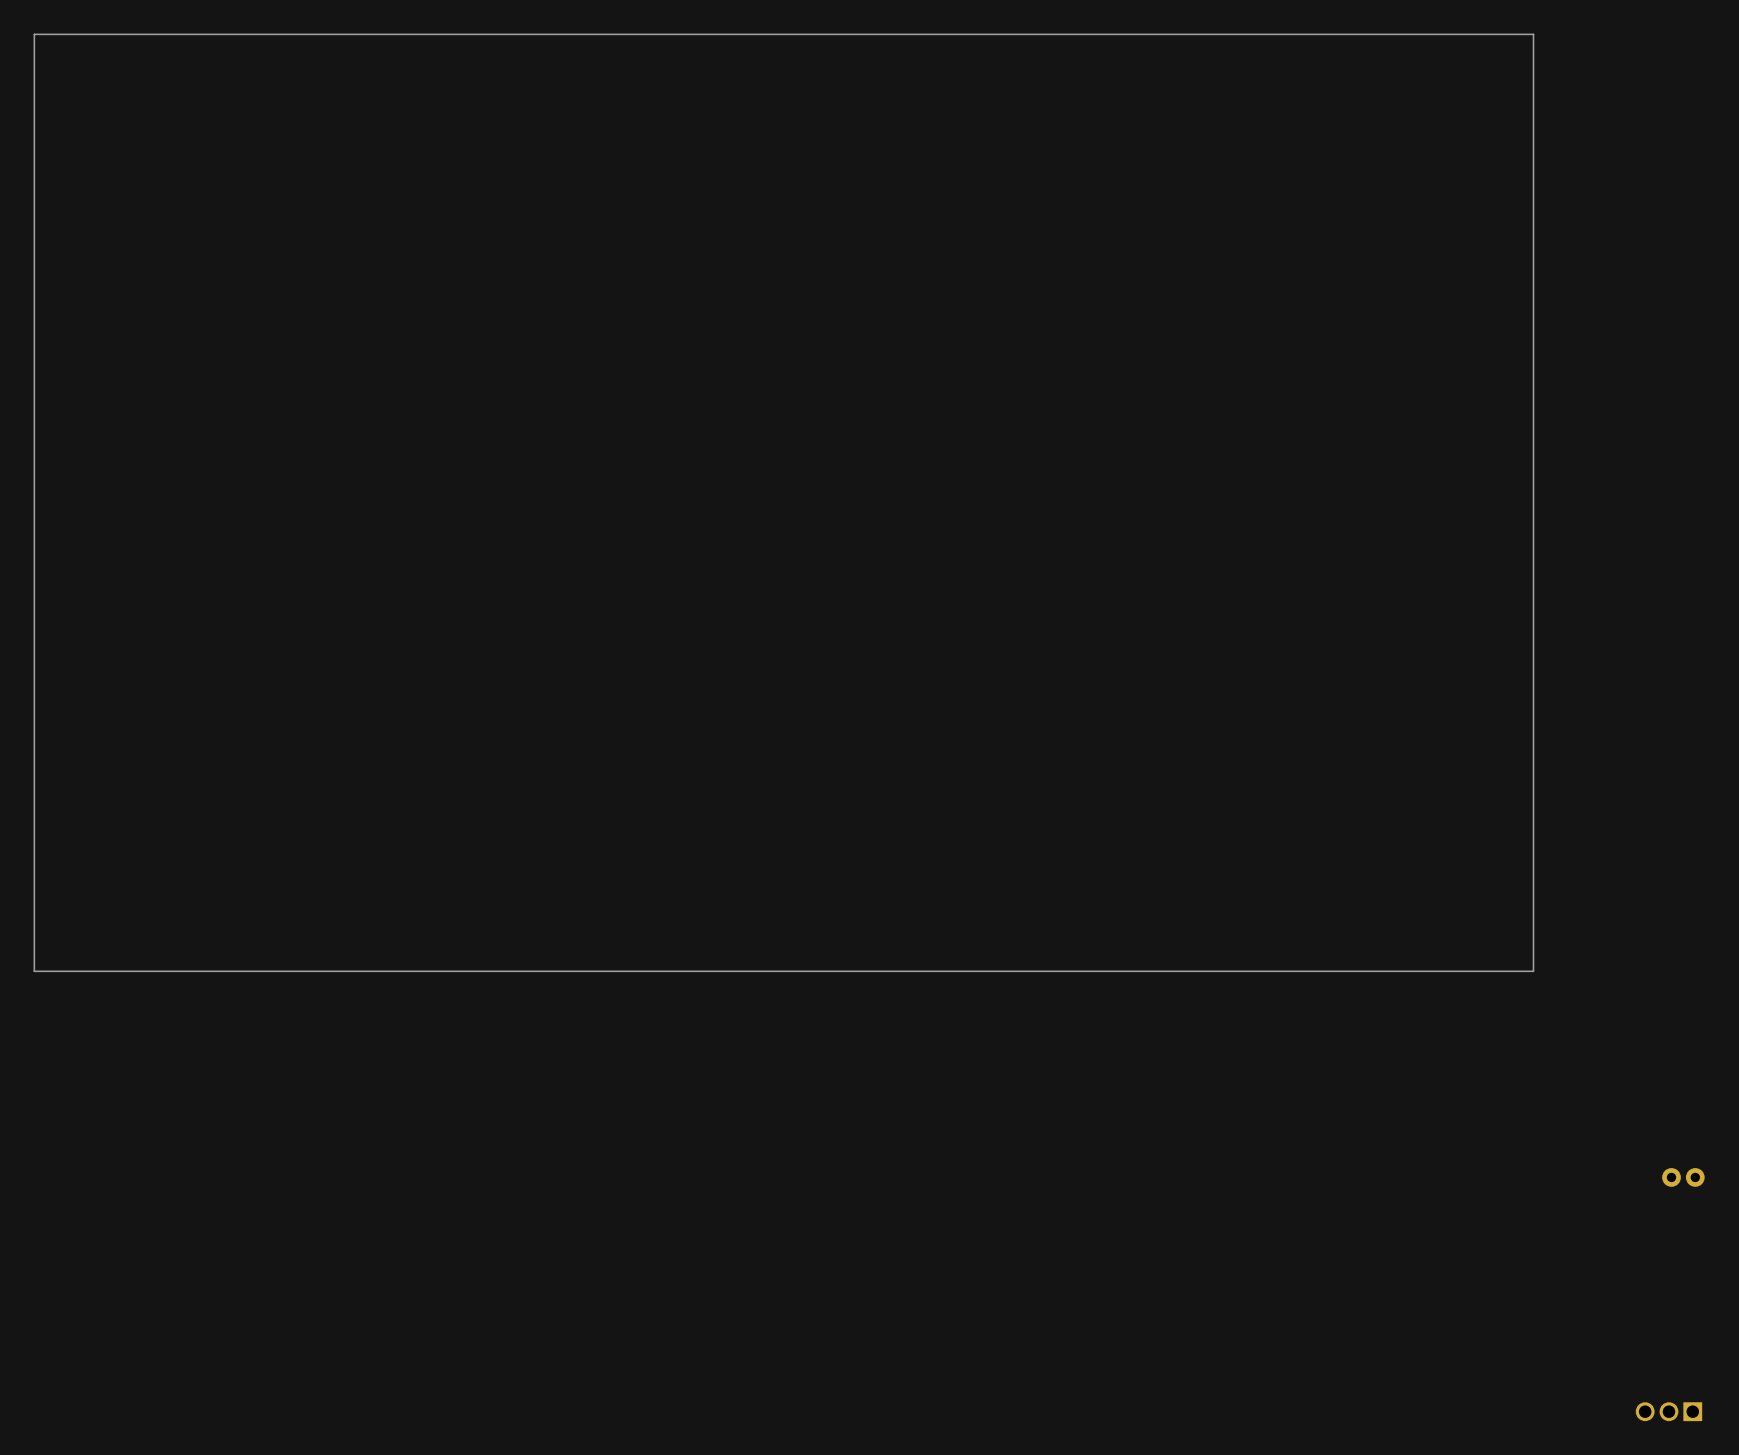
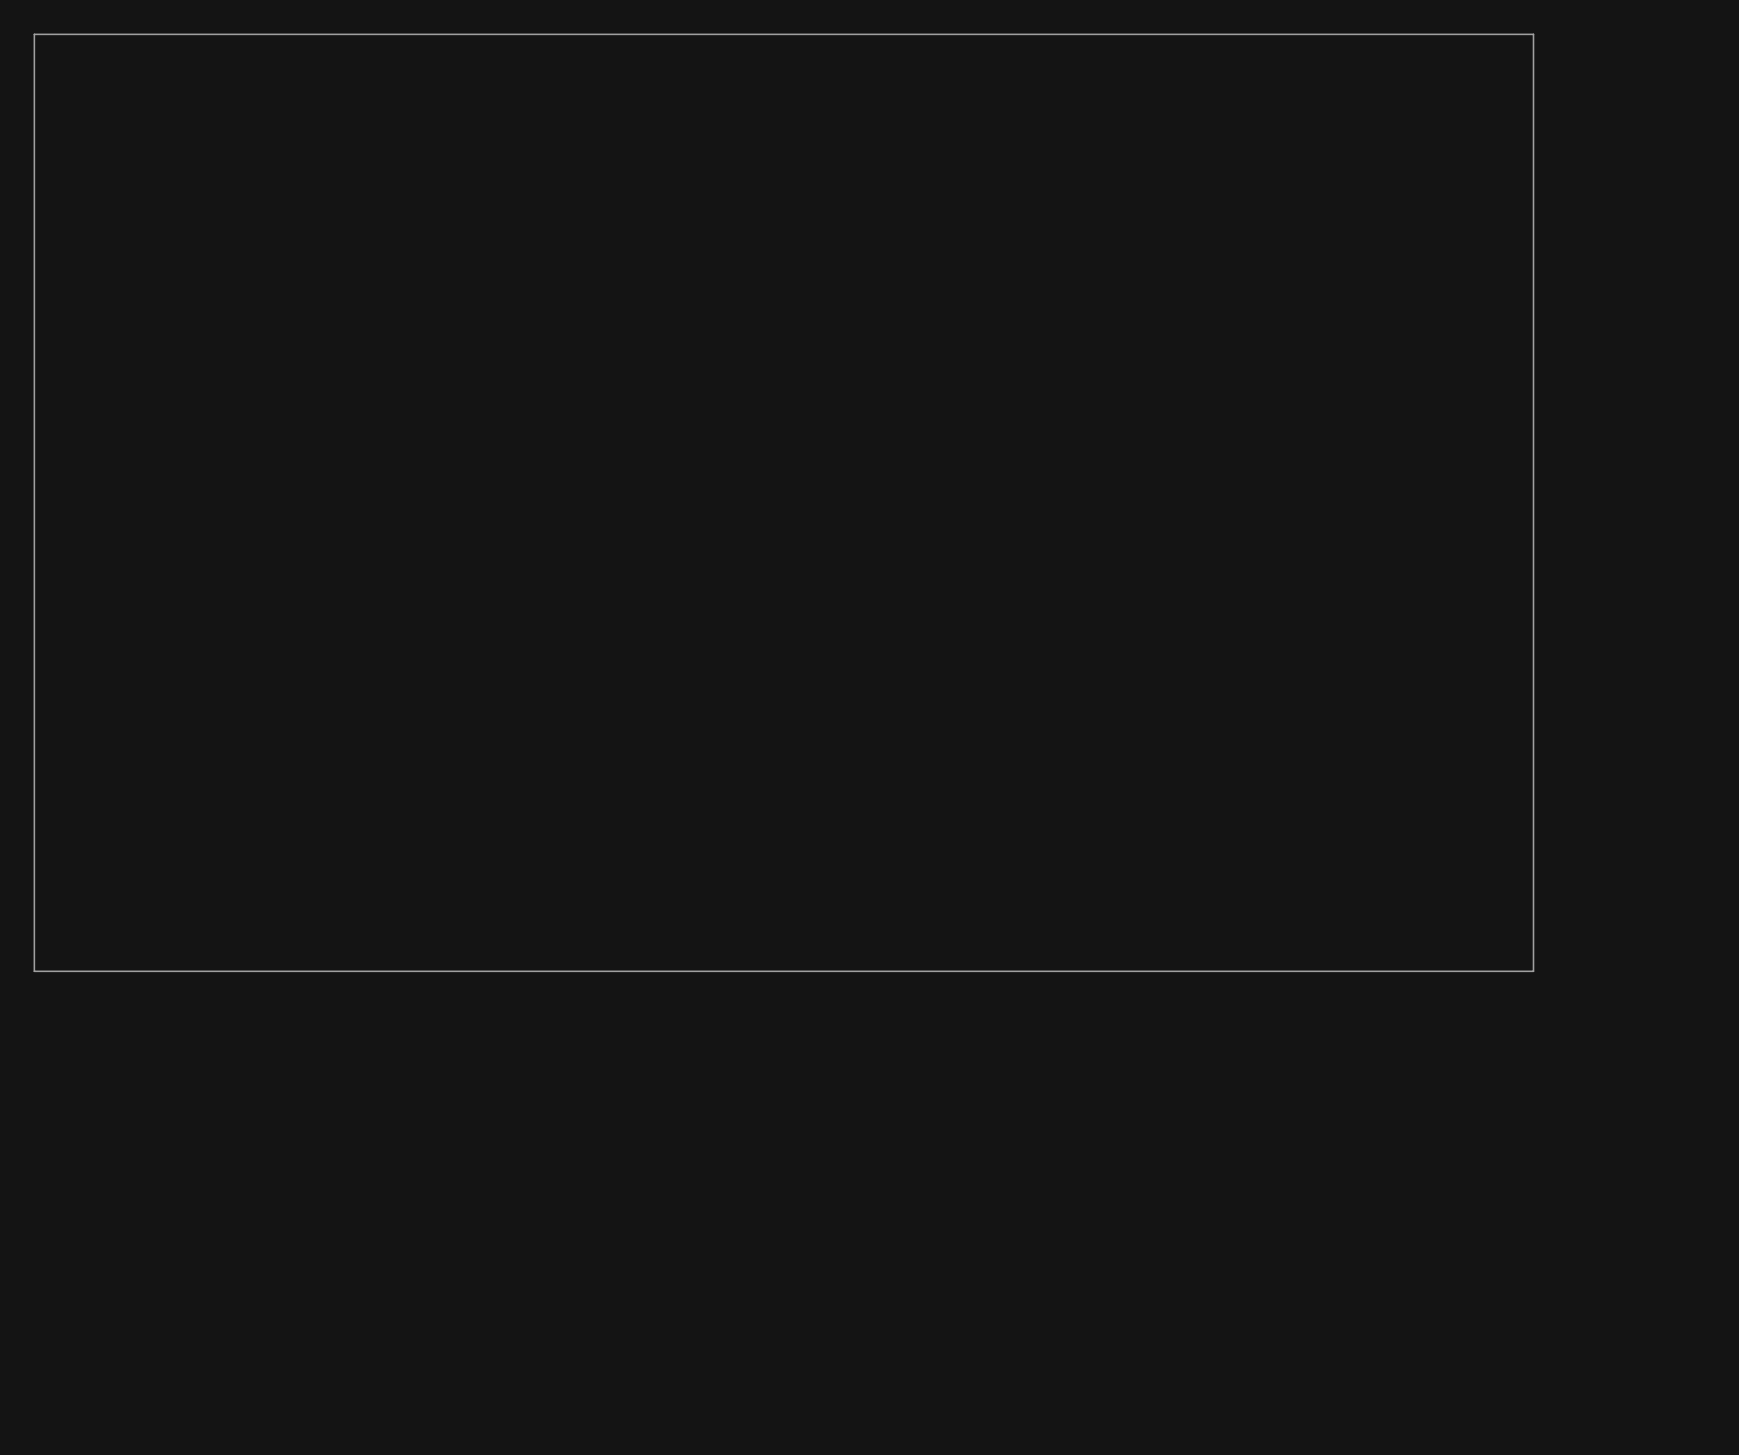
part: (1683, 1177) -> none
part: (1668, 1411) -> none

